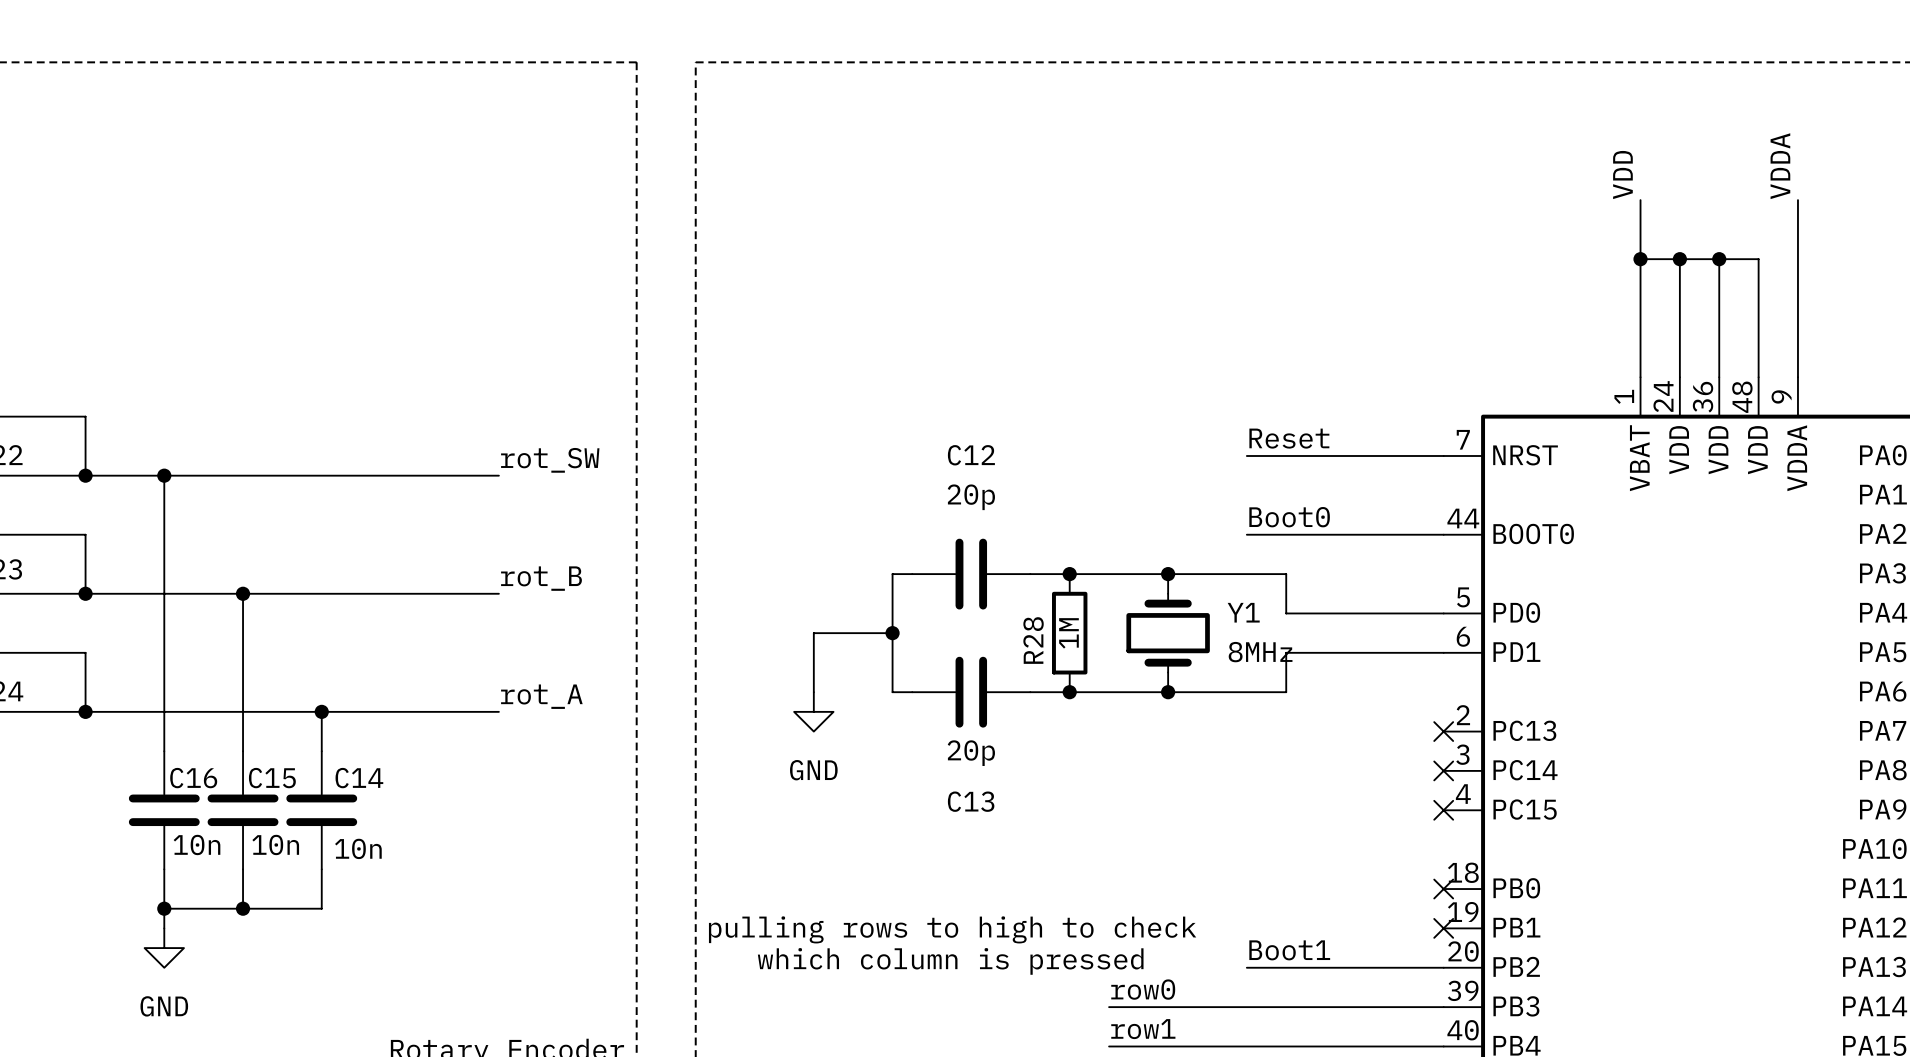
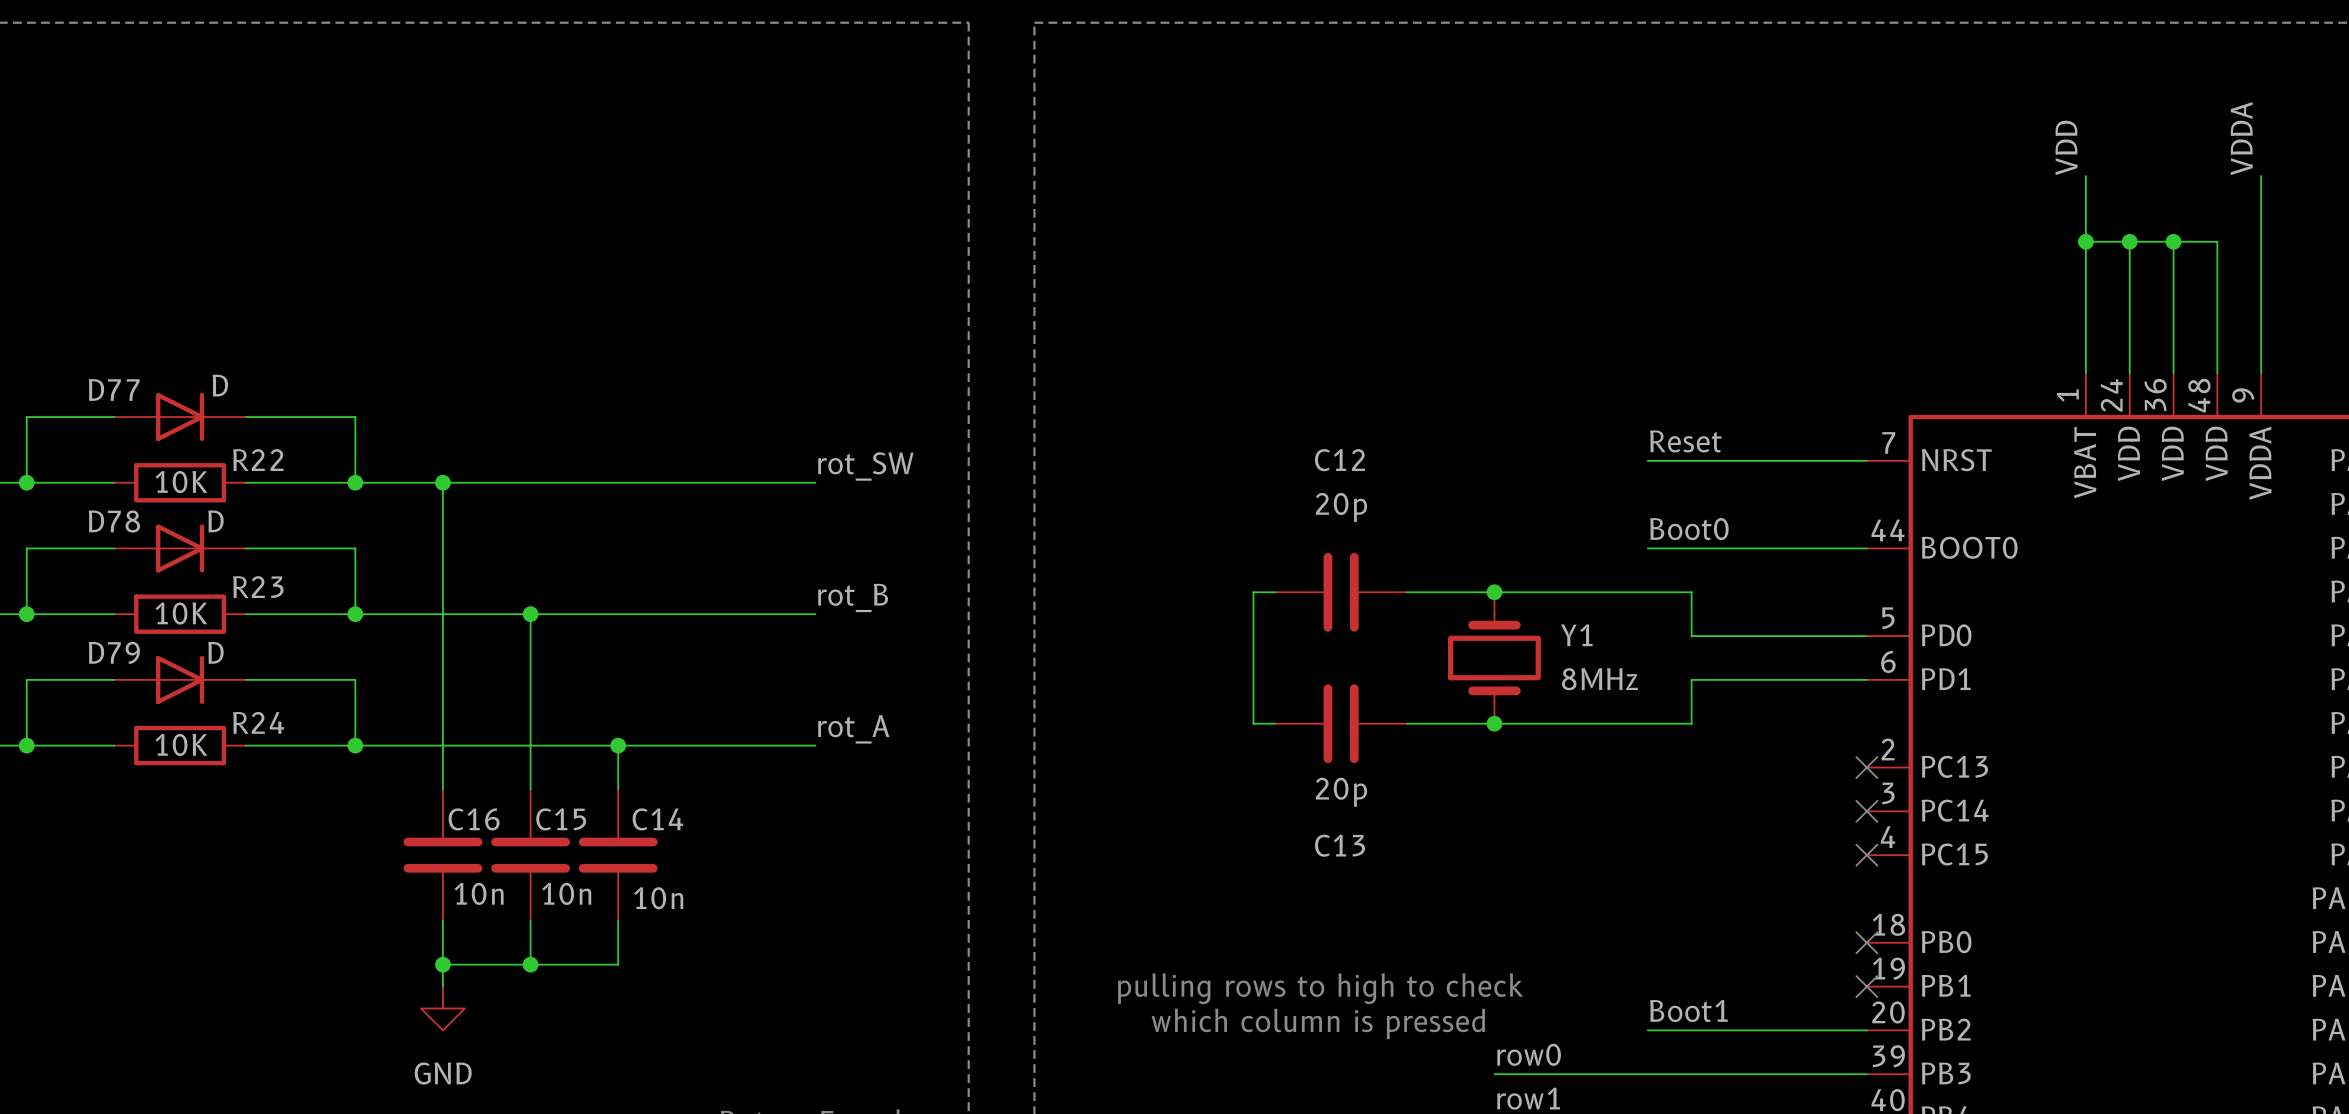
junction: (1069, 574) -> none
junction: none -> (1494, 592)
junction: (1168, 574) -> none
wire: (892, 633) (813, 633) (813, 692) -> none
junction: (892, 633) -> none
R28: 1M (1069, 633) -> none
Y1 position: (1168, 633) -> (1494, 657)
junction: (1069, 692) -> none
junction: none -> (1494, 723)
junction: (1168, 692) -> none
power symbol: GND (813, 711) -> none

